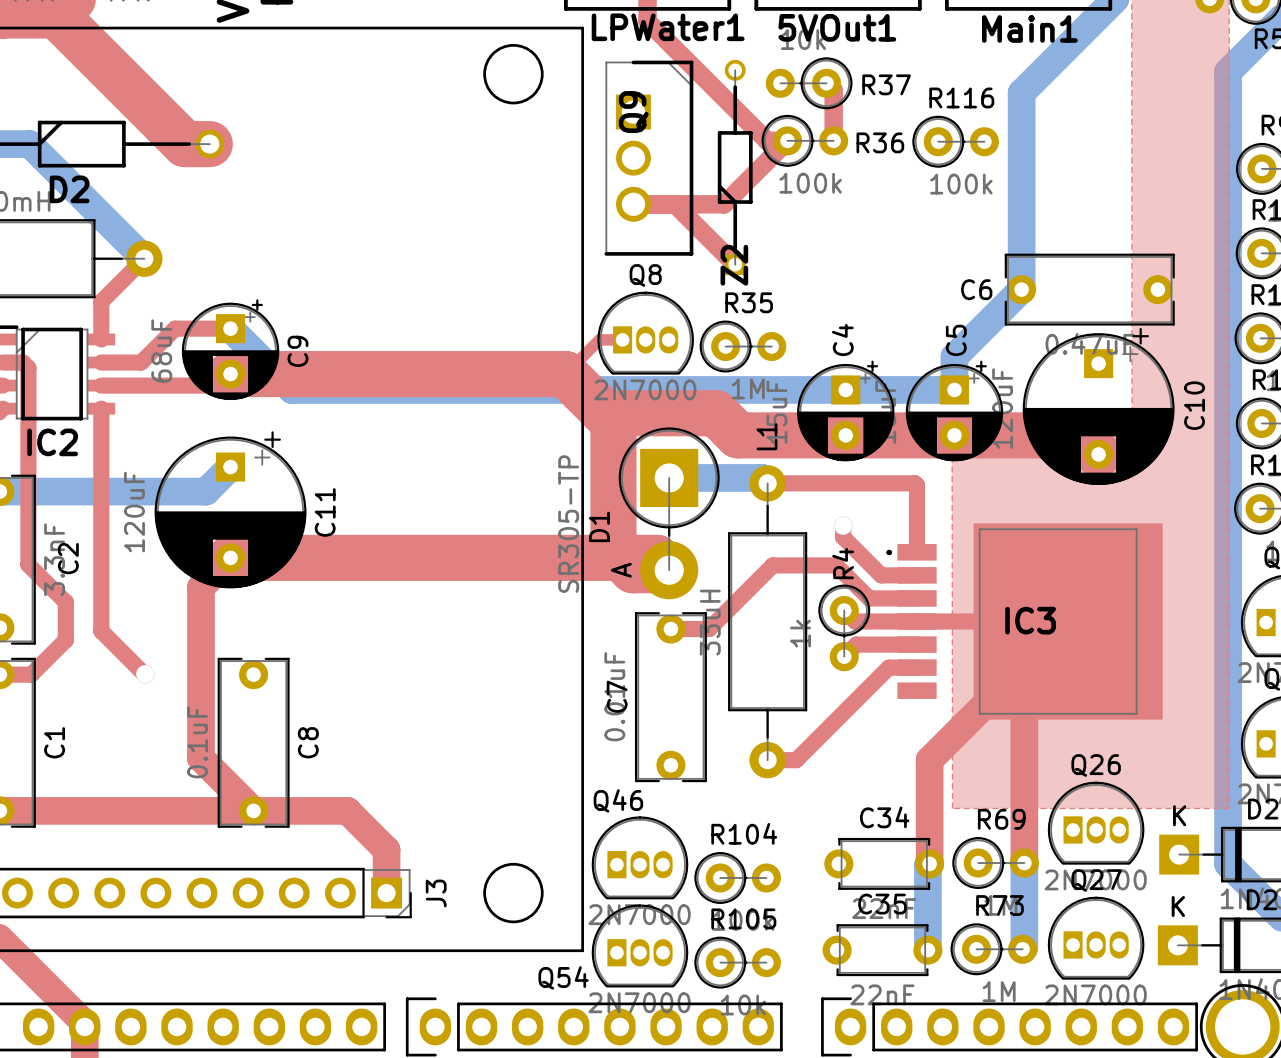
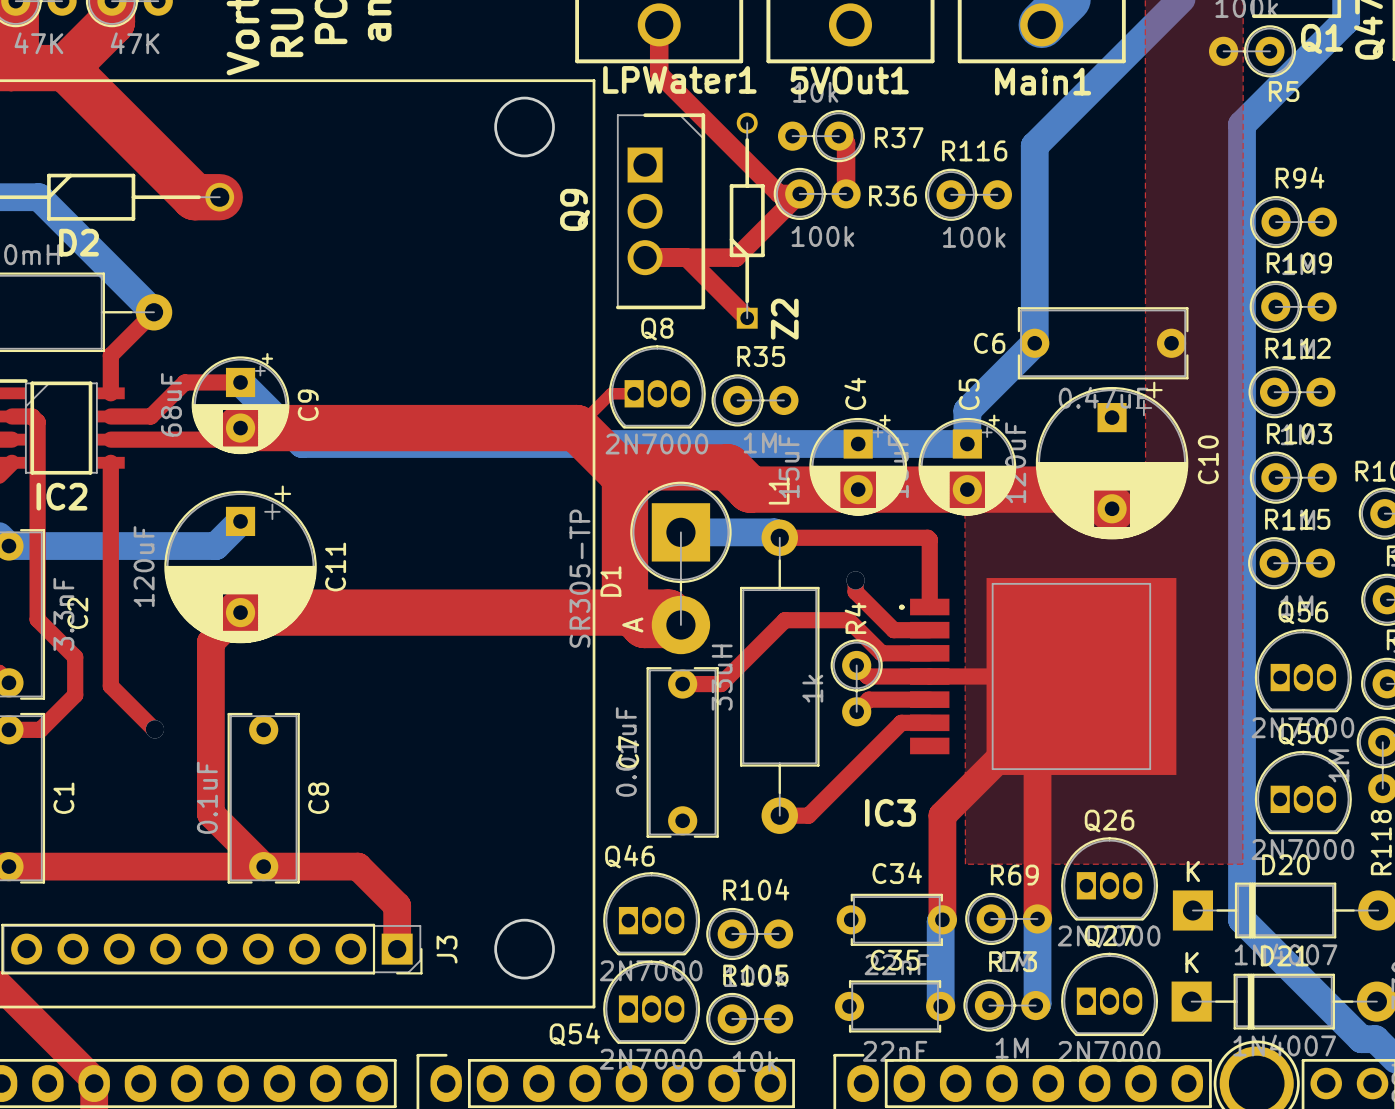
Q9 name position: Q9 (633, 112) -> Q9 (575, 209)
Z2 name position: Z2 (734, 265) -> Z2 (784, 319)
IC3 name position: IC3 (1030, 620) -> IC3 (890, 812)

